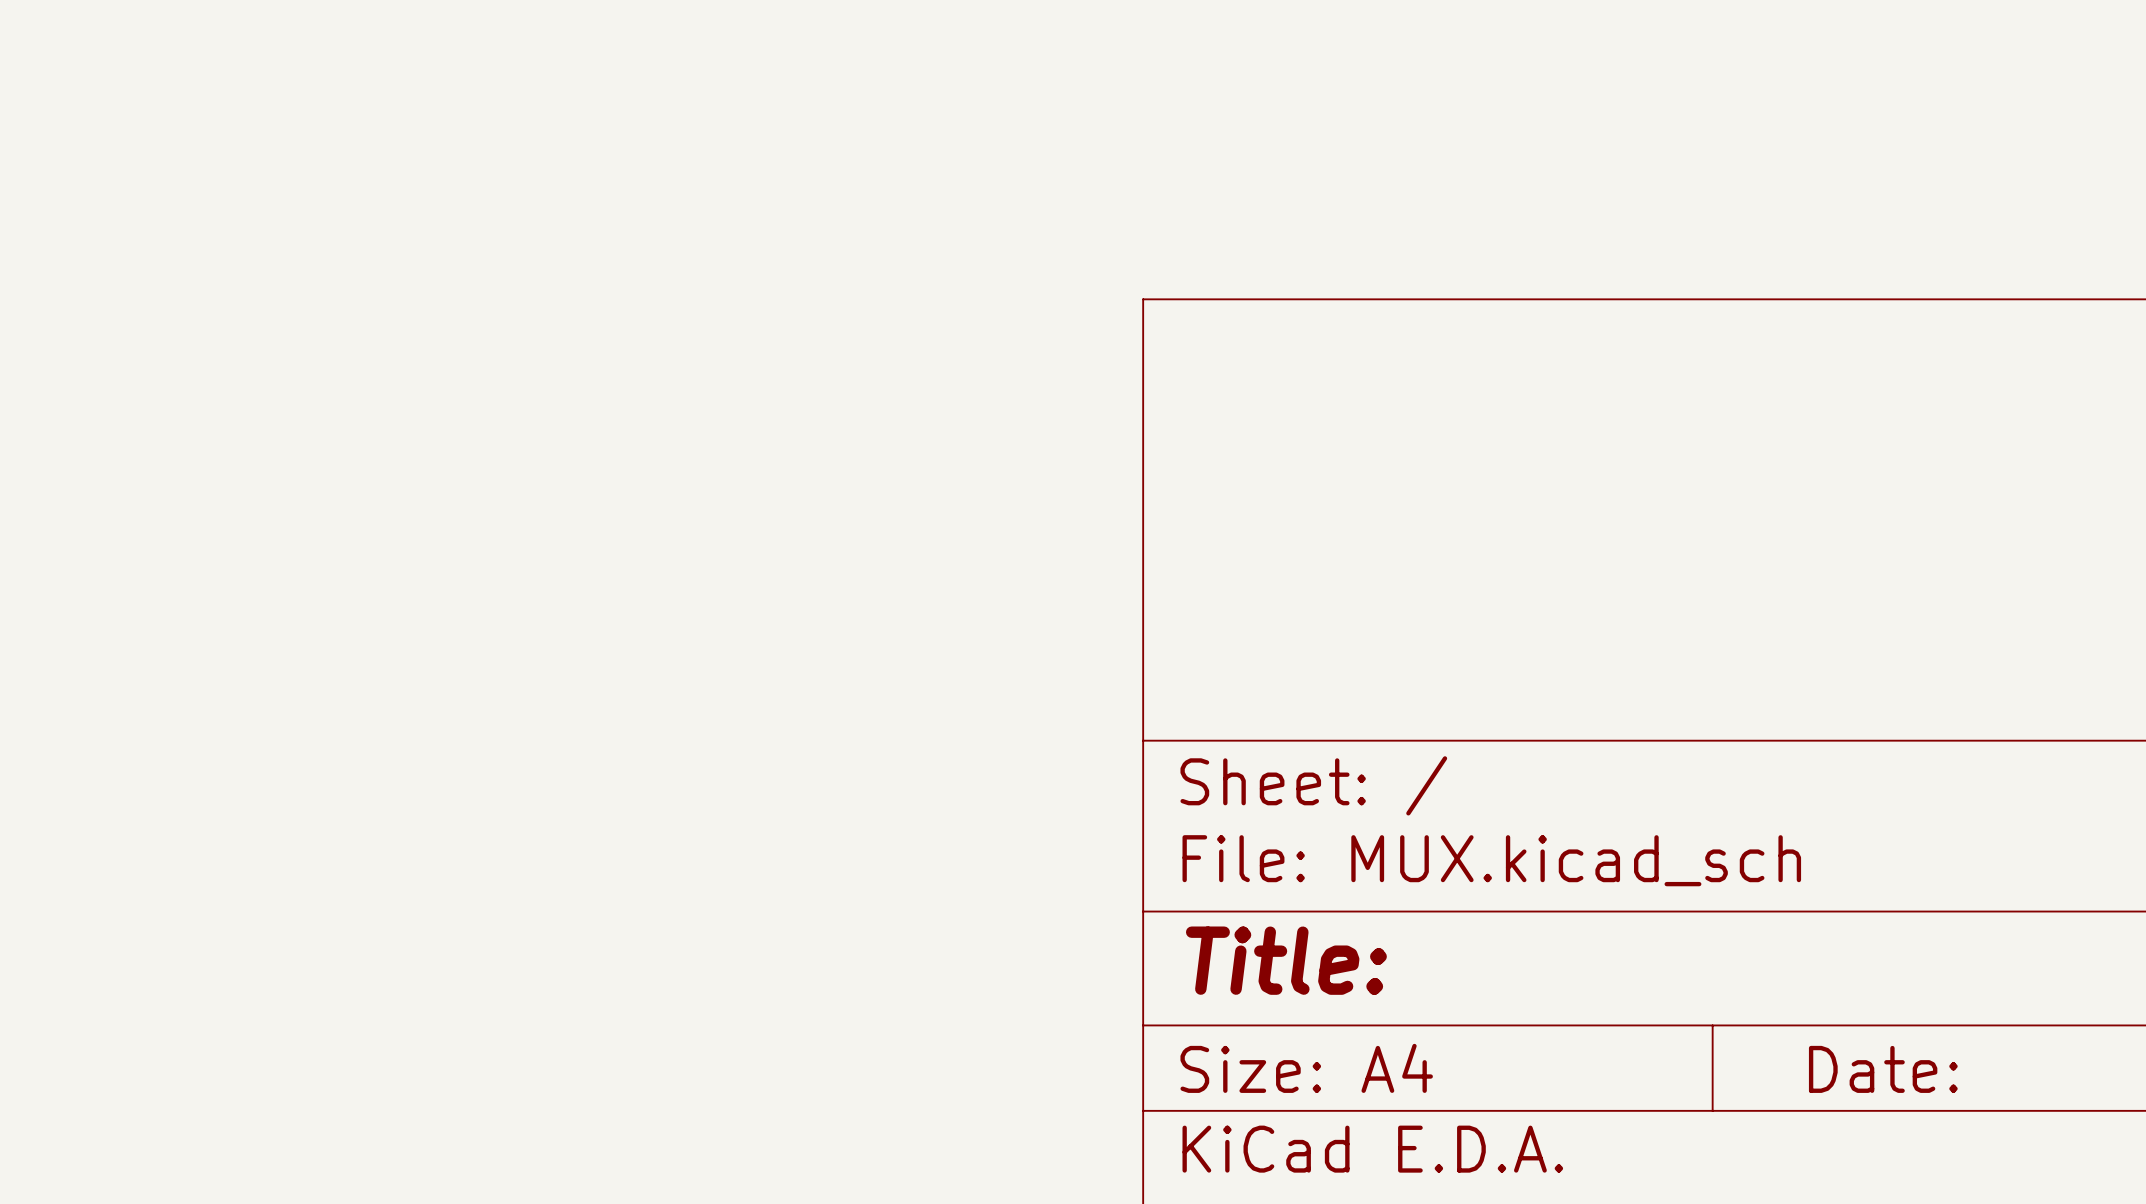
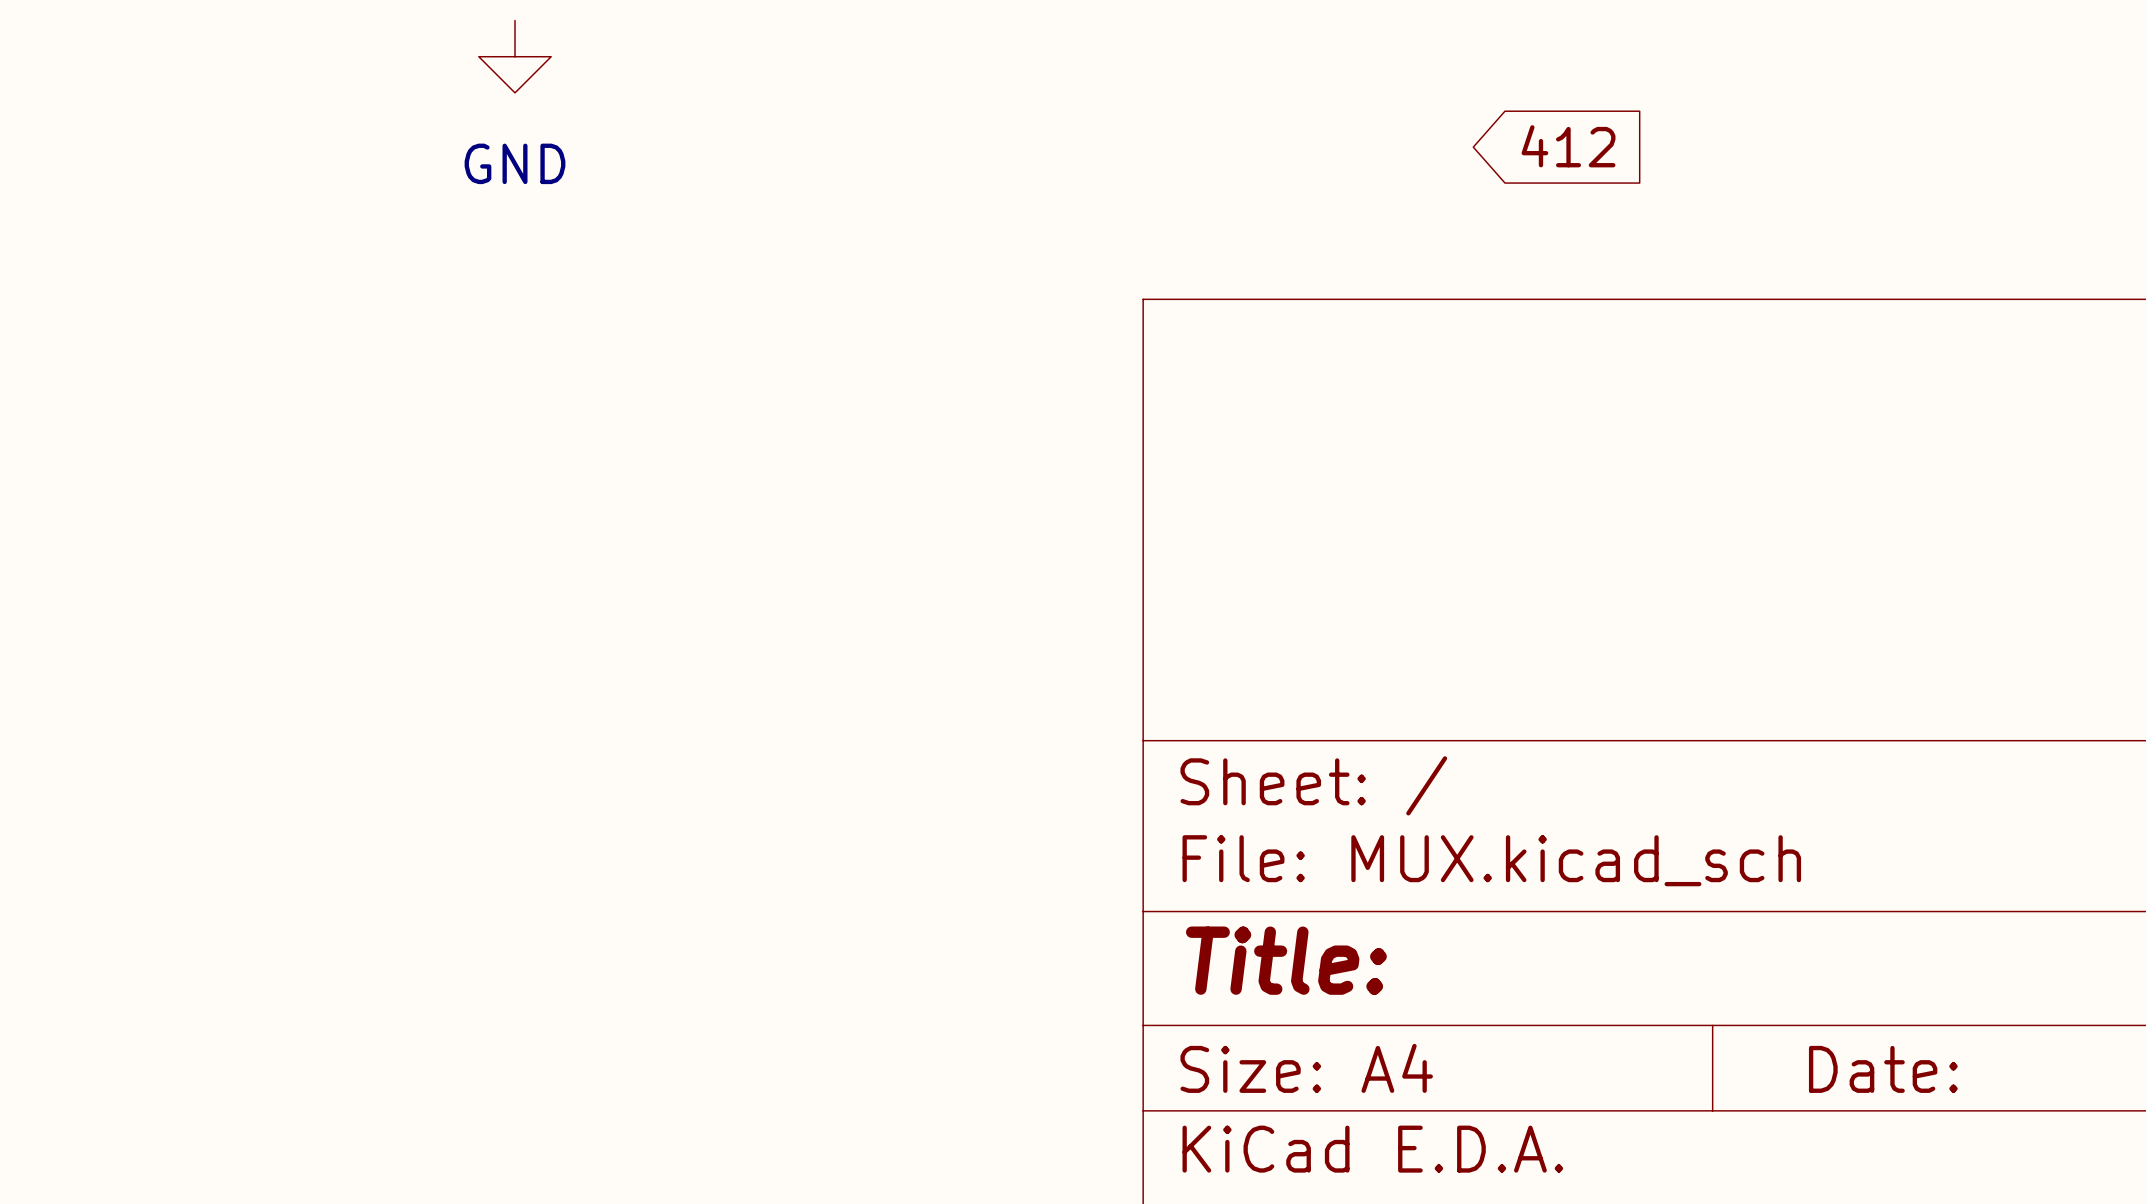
power symbol: none -> GND (515, 56)
global label: none -> 412 (1568, 146)

